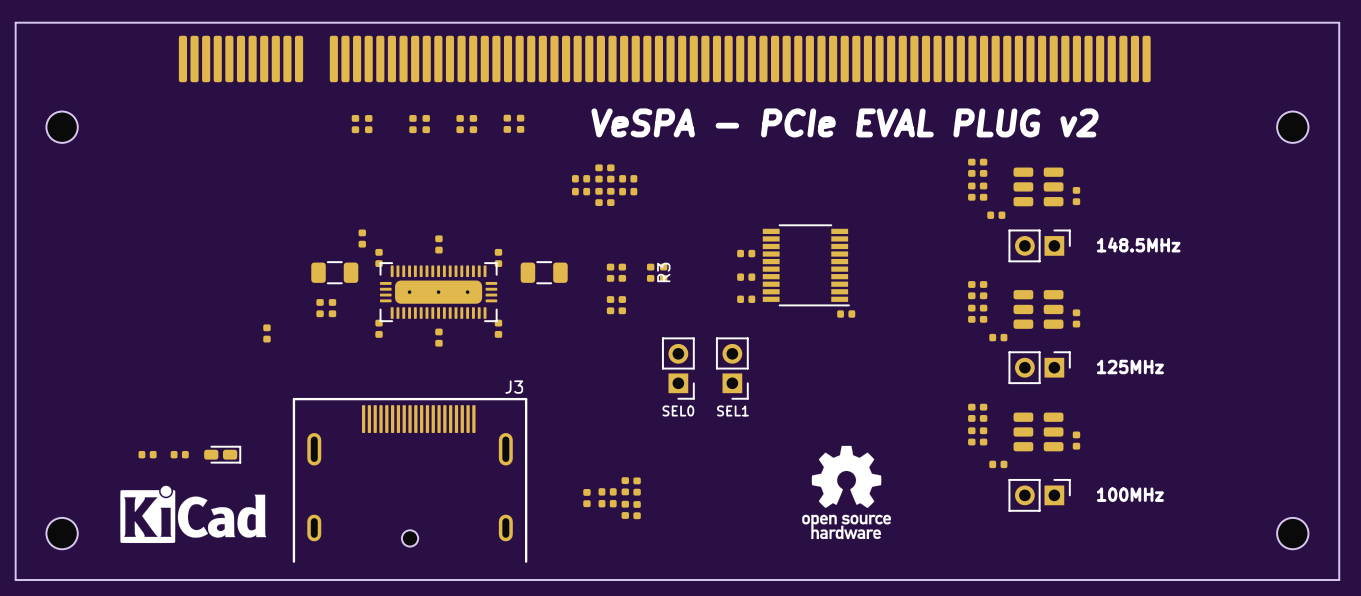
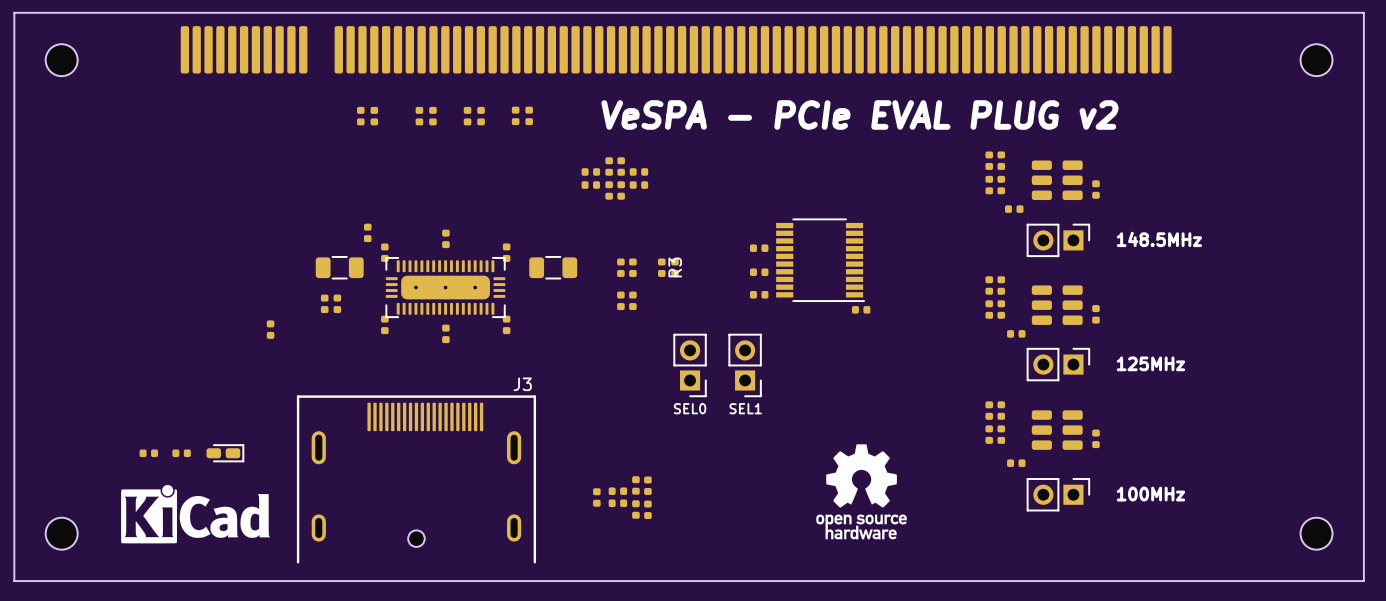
part position: (62, 127) -> (61, 60)
part position: (1292, 127) -> (1316, 60)

